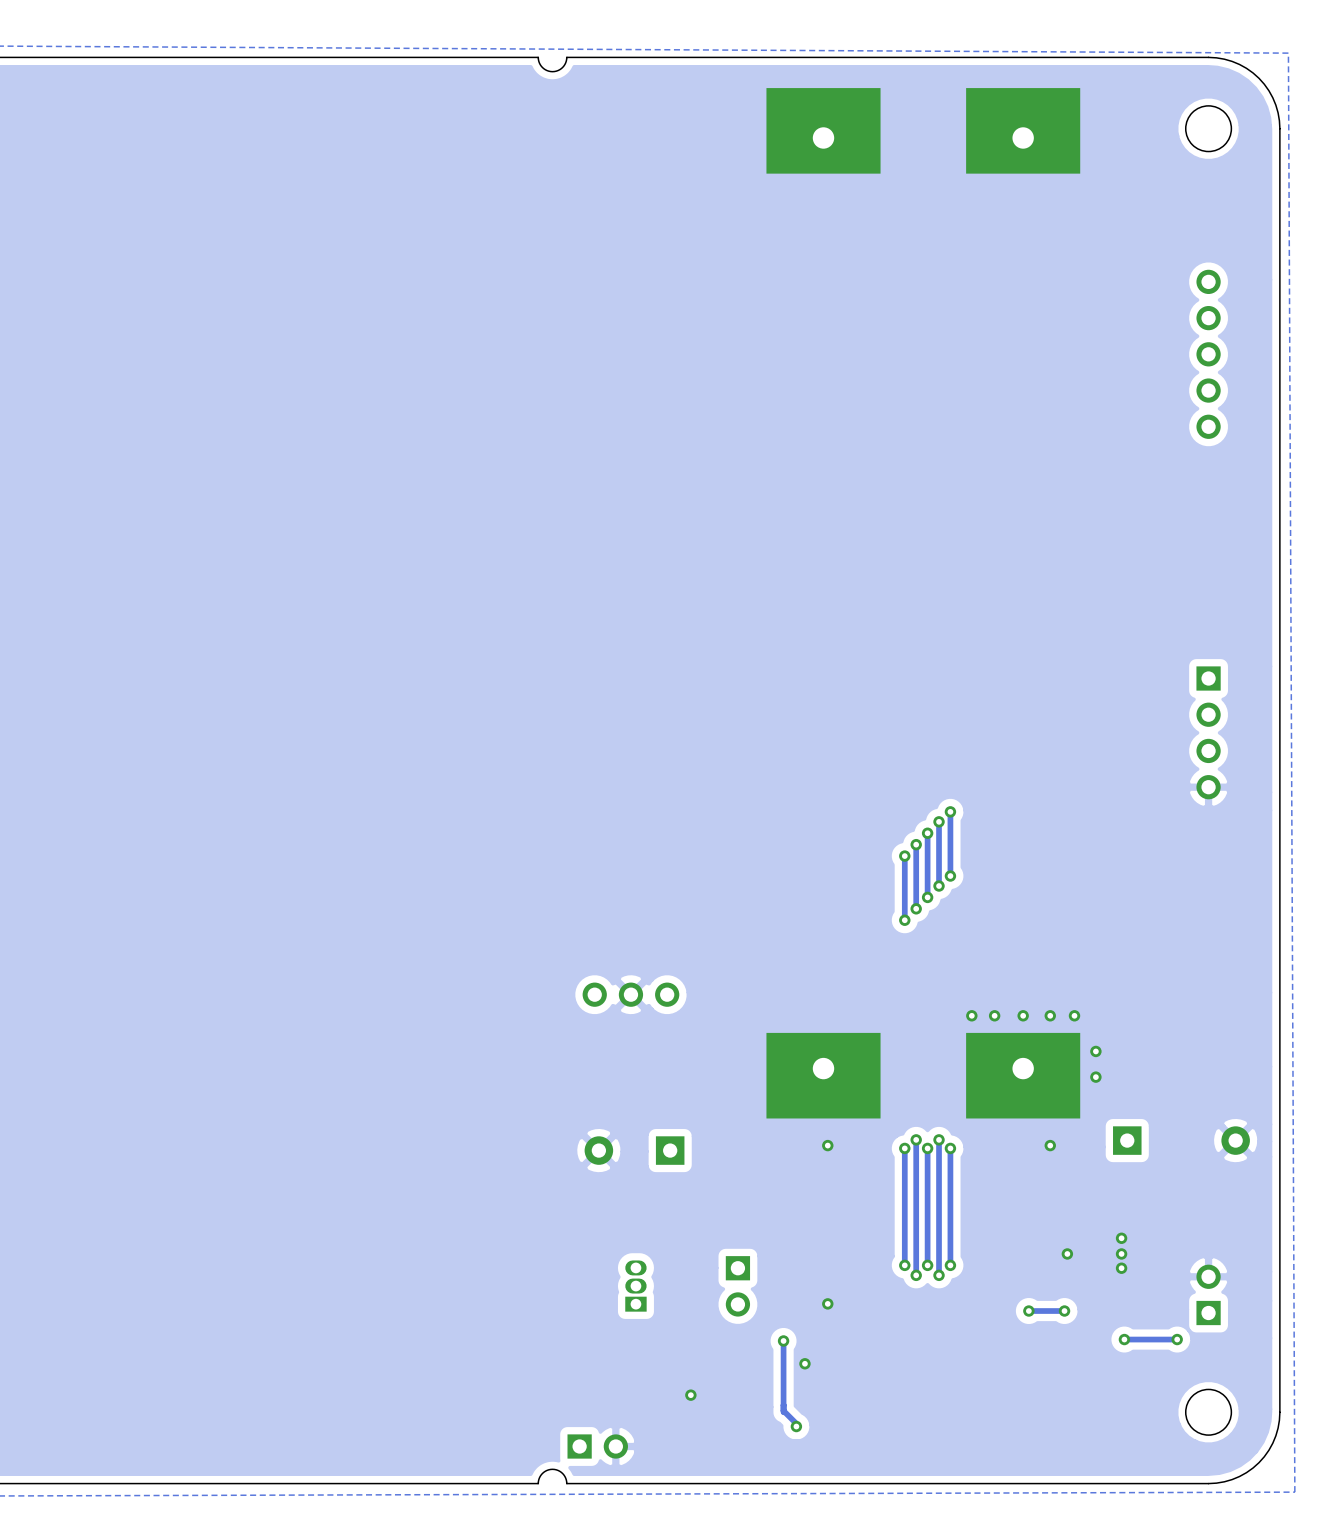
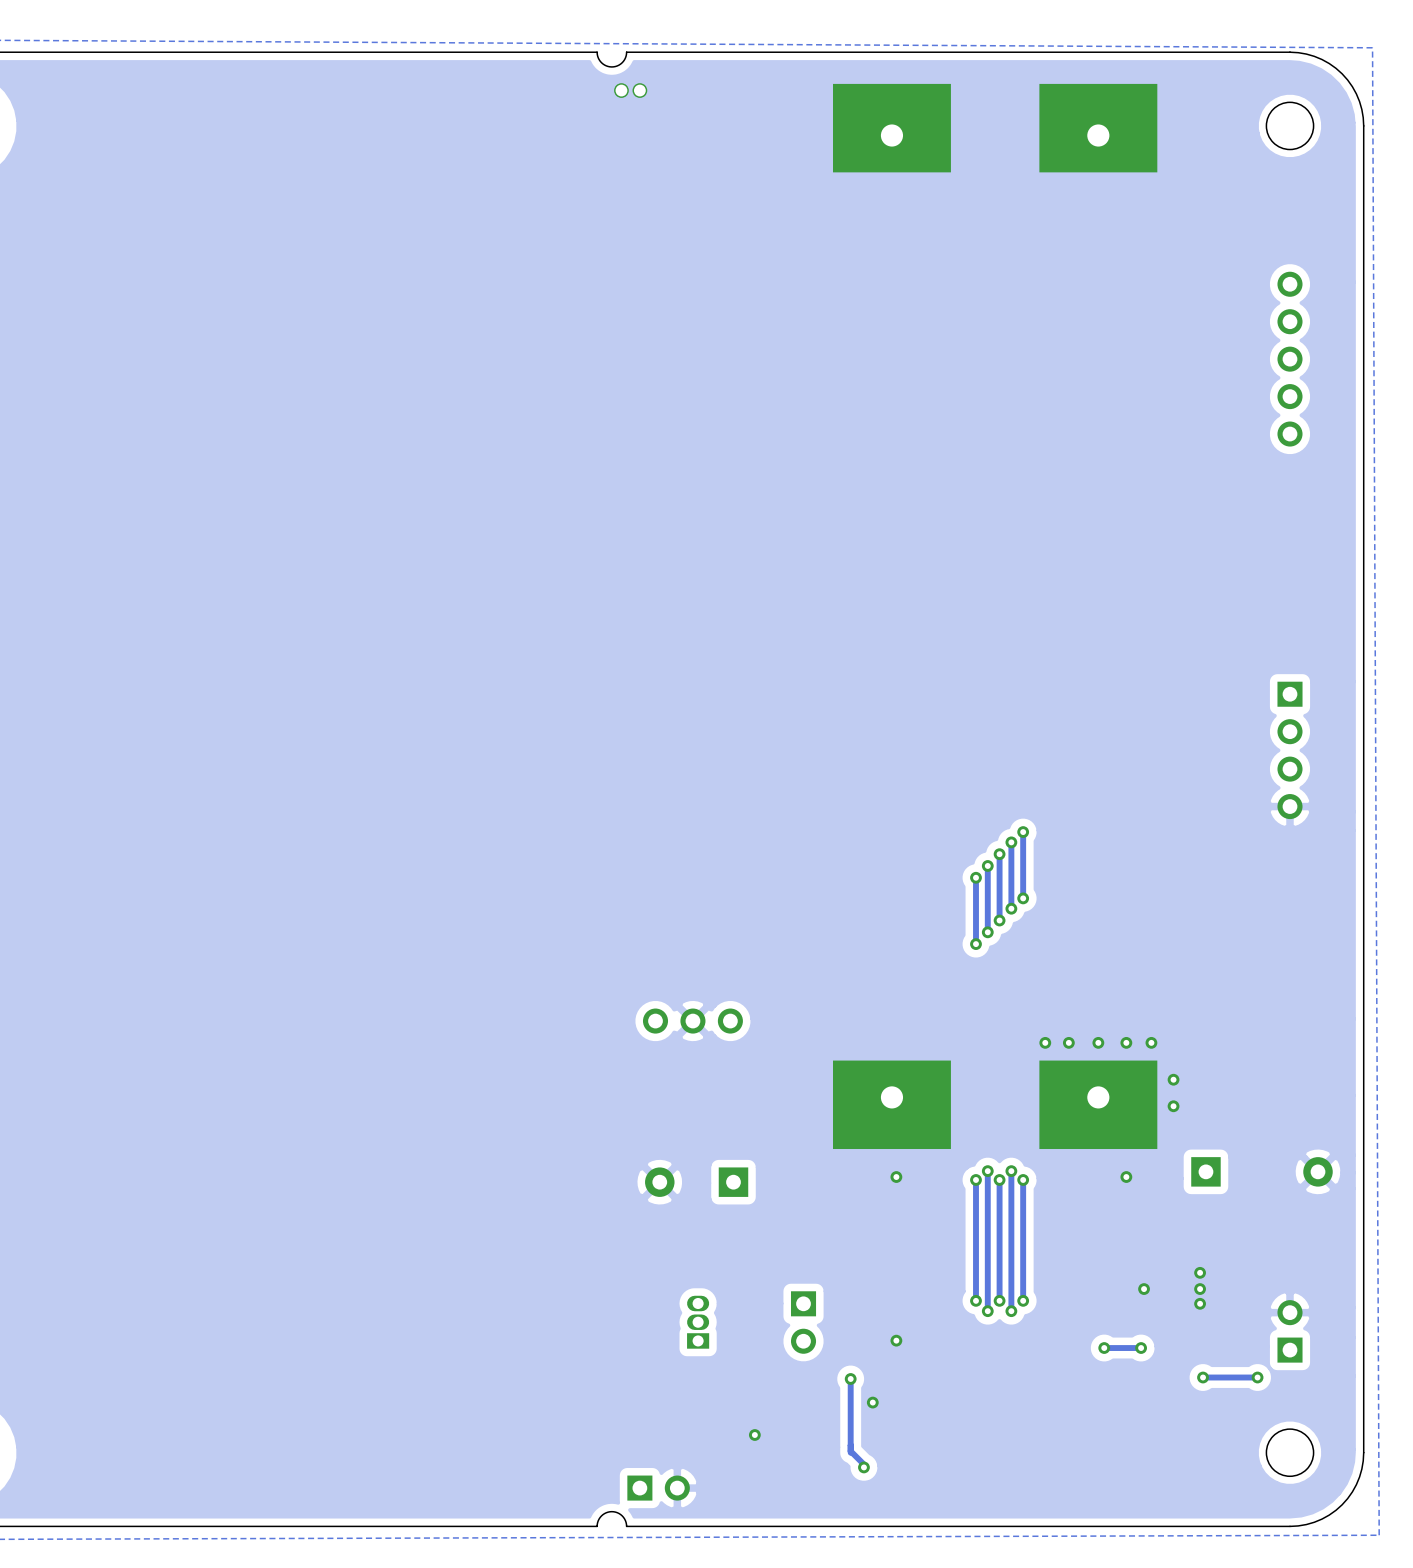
via: none -> (621, 90)
via: none -> (639, 90)

